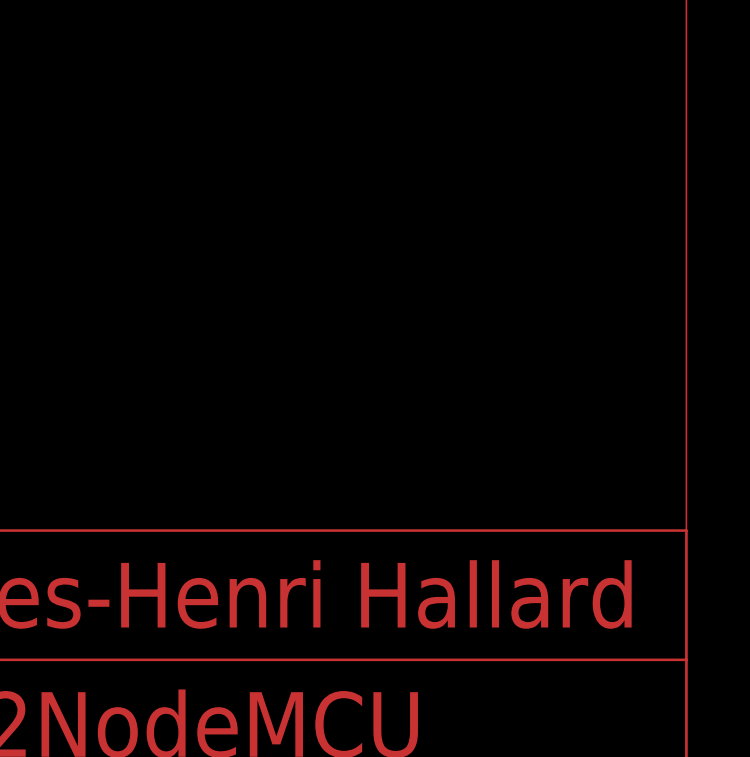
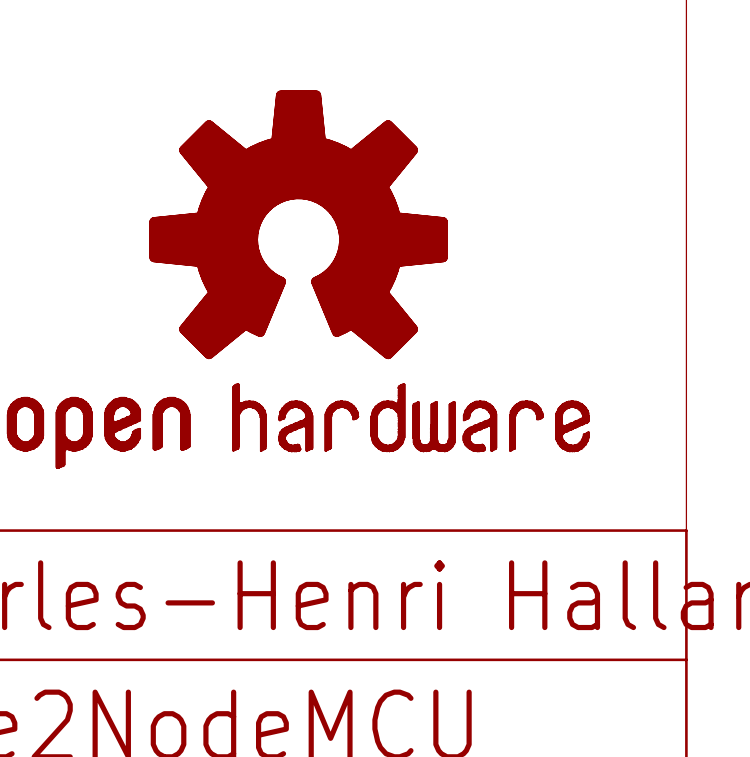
part: none -> (298, 279)

